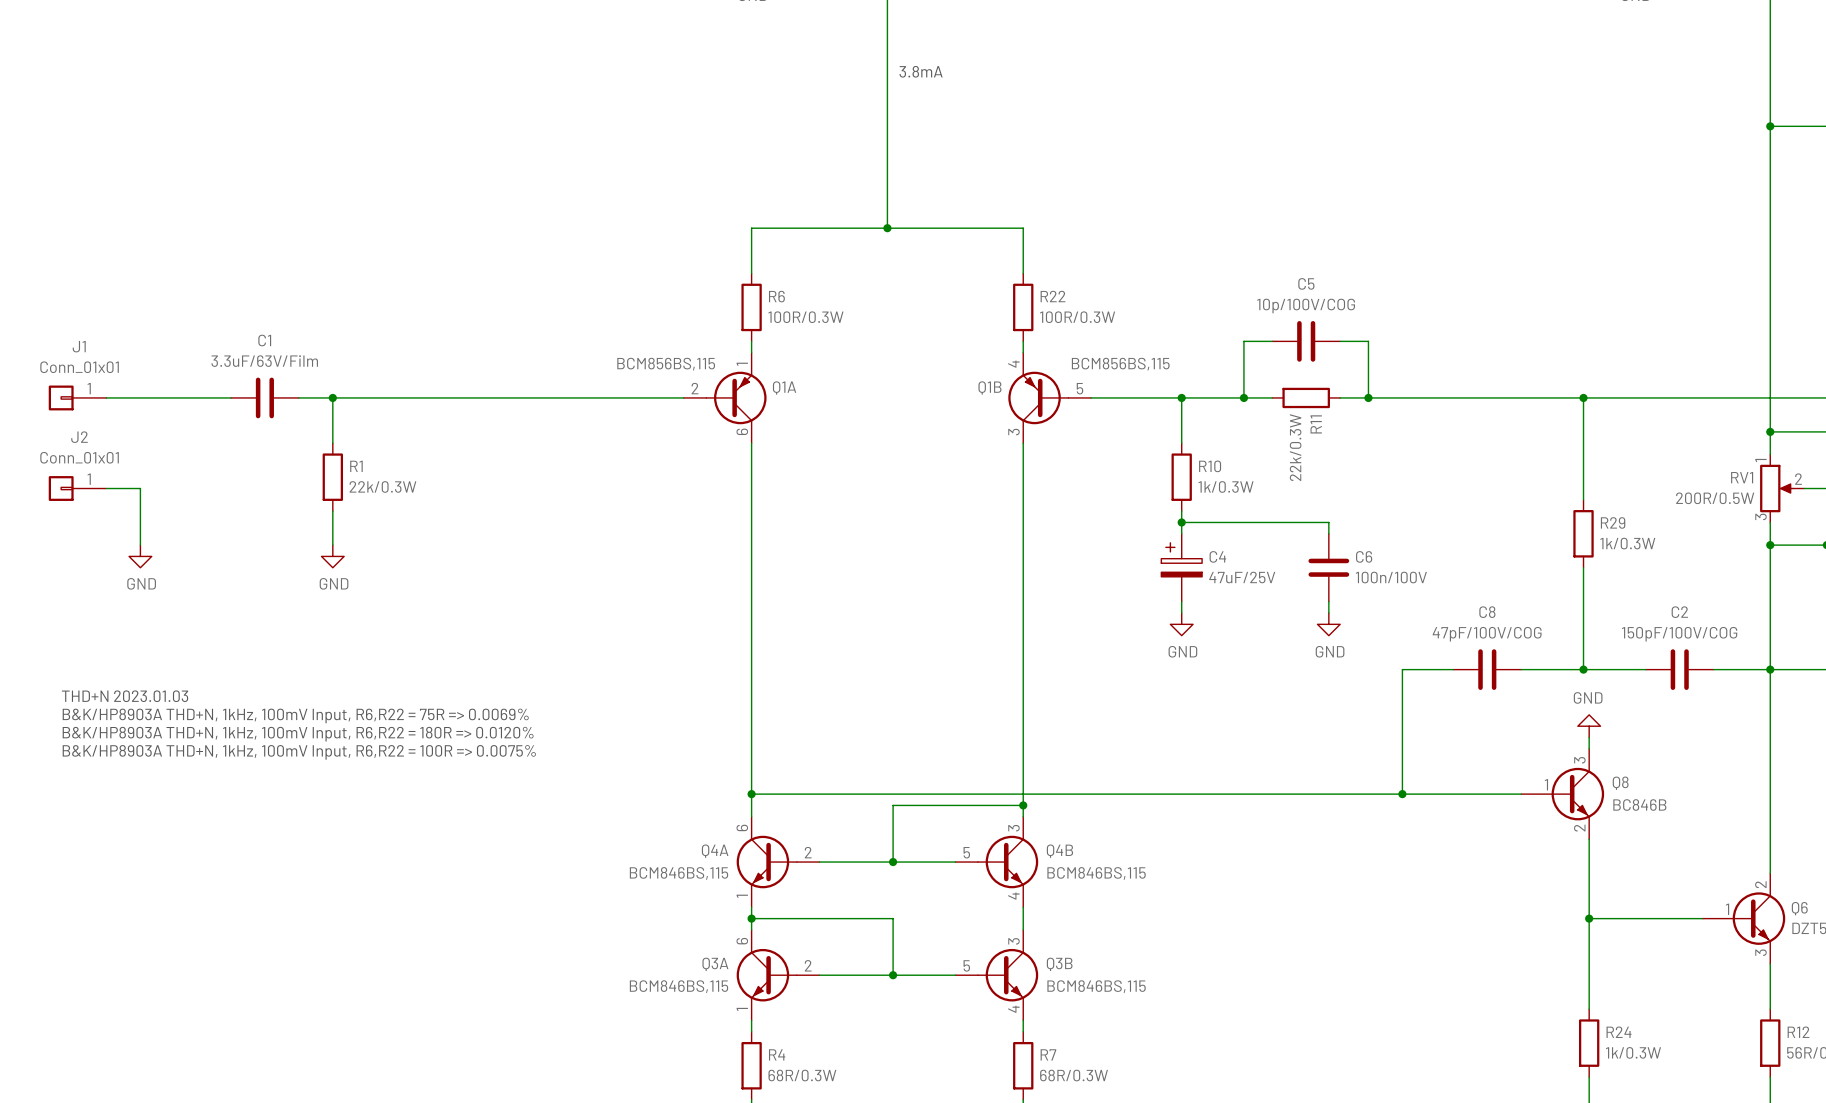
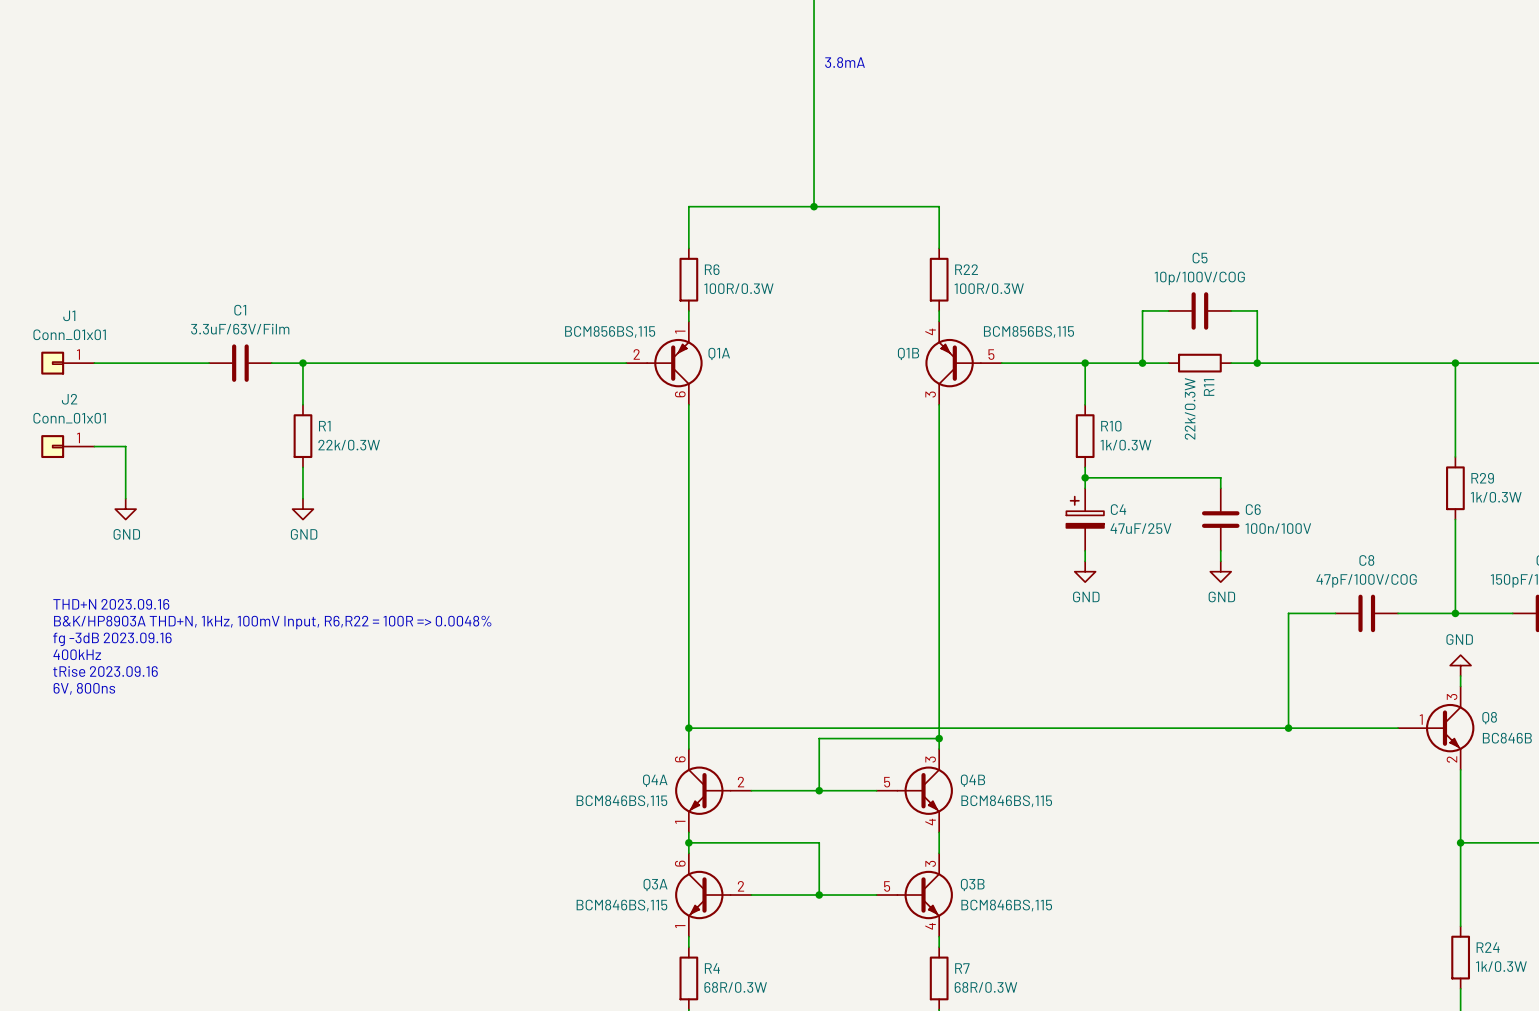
text: none -> THD+N 2023.09.16 (111, 604)
text: none -> B&K/HP8903A THD+N, 1kHz, 100mV Input, R6,R22 = 100R => 0.0048% (272, 622)
text: THD+N 2023.01.03 (125, 696) -> fg -3dB 2023.09.16 (112, 639)
text: B&K/HP8903A THD+N, 1kHz, 100mV Input, R6,R22 = 75R => 0.0069% (295, 715) -> 400kHz (77, 654)
text: B&K/HP8903A THD+N, 1kHz, 100mV Input, R6,R22 = 180R => 0.0120% (298, 734) -> tRise 2023.09.16 (105, 671)
text: B&K/HP8903A THD+N, 1kHz, 100mV Input, R6,R22 = 100R => 0.0075% (299, 752) -> 6V, 800ns (84, 688)

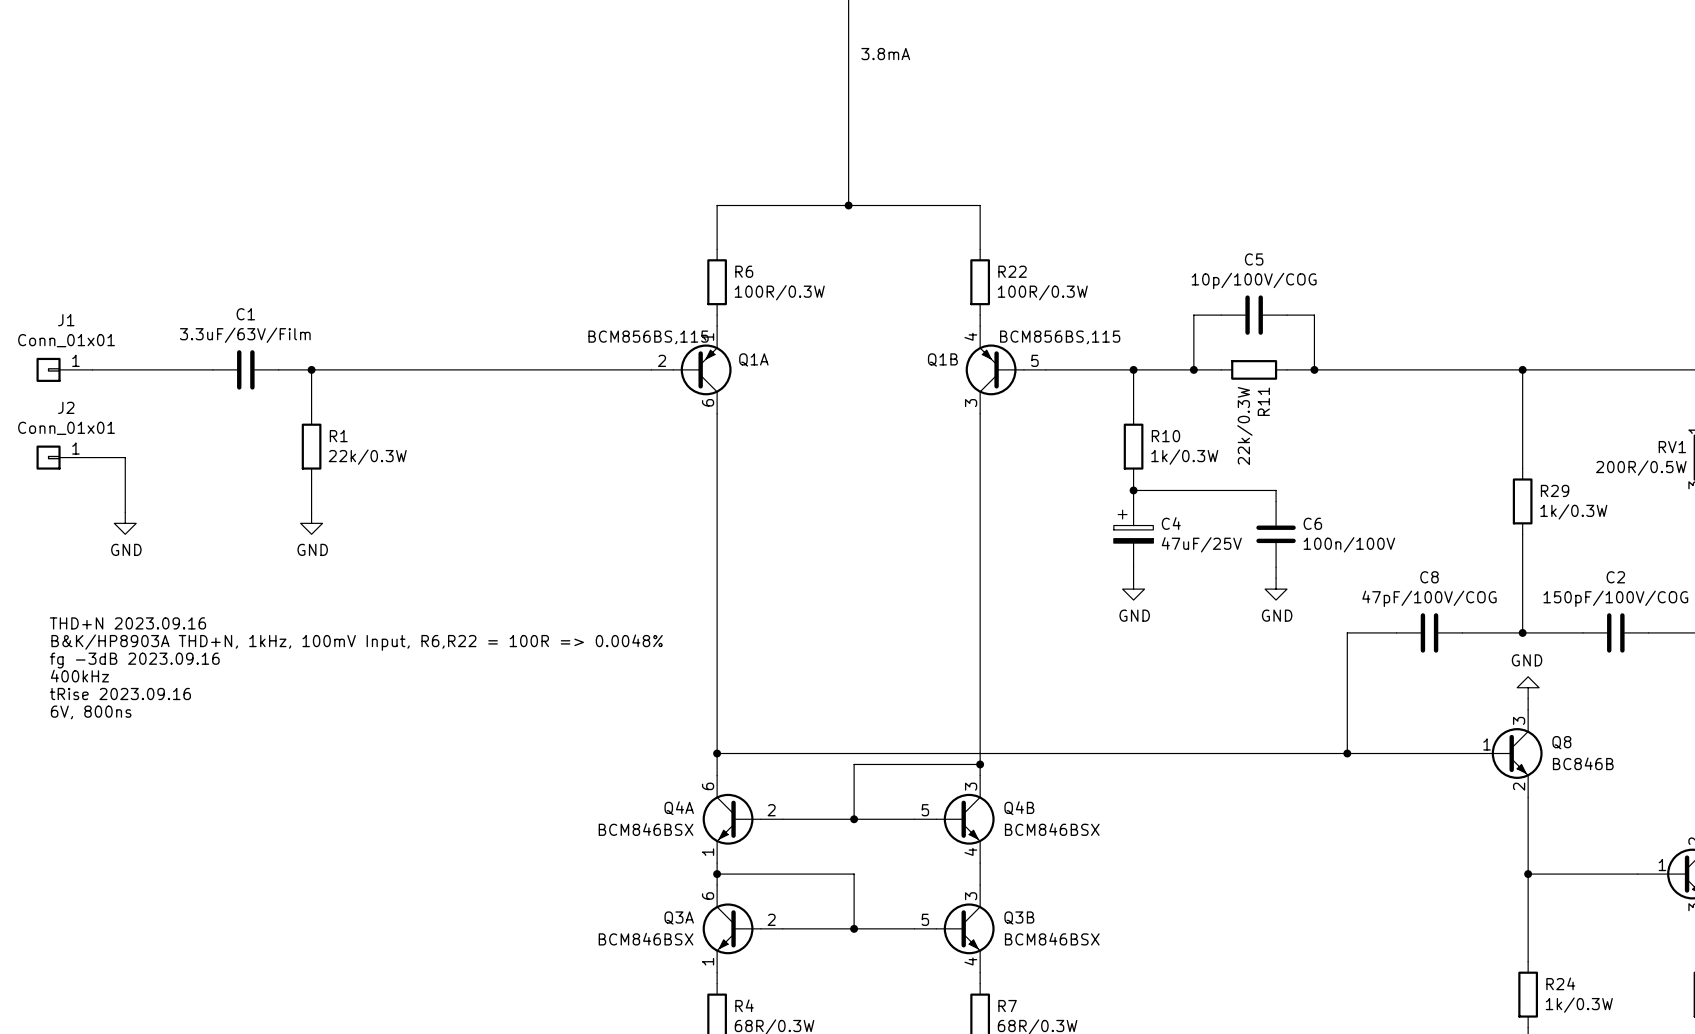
Q4A value: BCM846BS,115 (621, 801) -> BCM846BSX (646, 829)
Q4B value: BCM846BS,115 (1006, 801) -> BCM846BSX (1052, 829)
Q3A value: BCM846BS,115 (621, 905) -> BCM846BSX (646, 939)
Q3B value: BCM846BS,115 (1006, 905) -> BCM846BSX (1052, 939)

